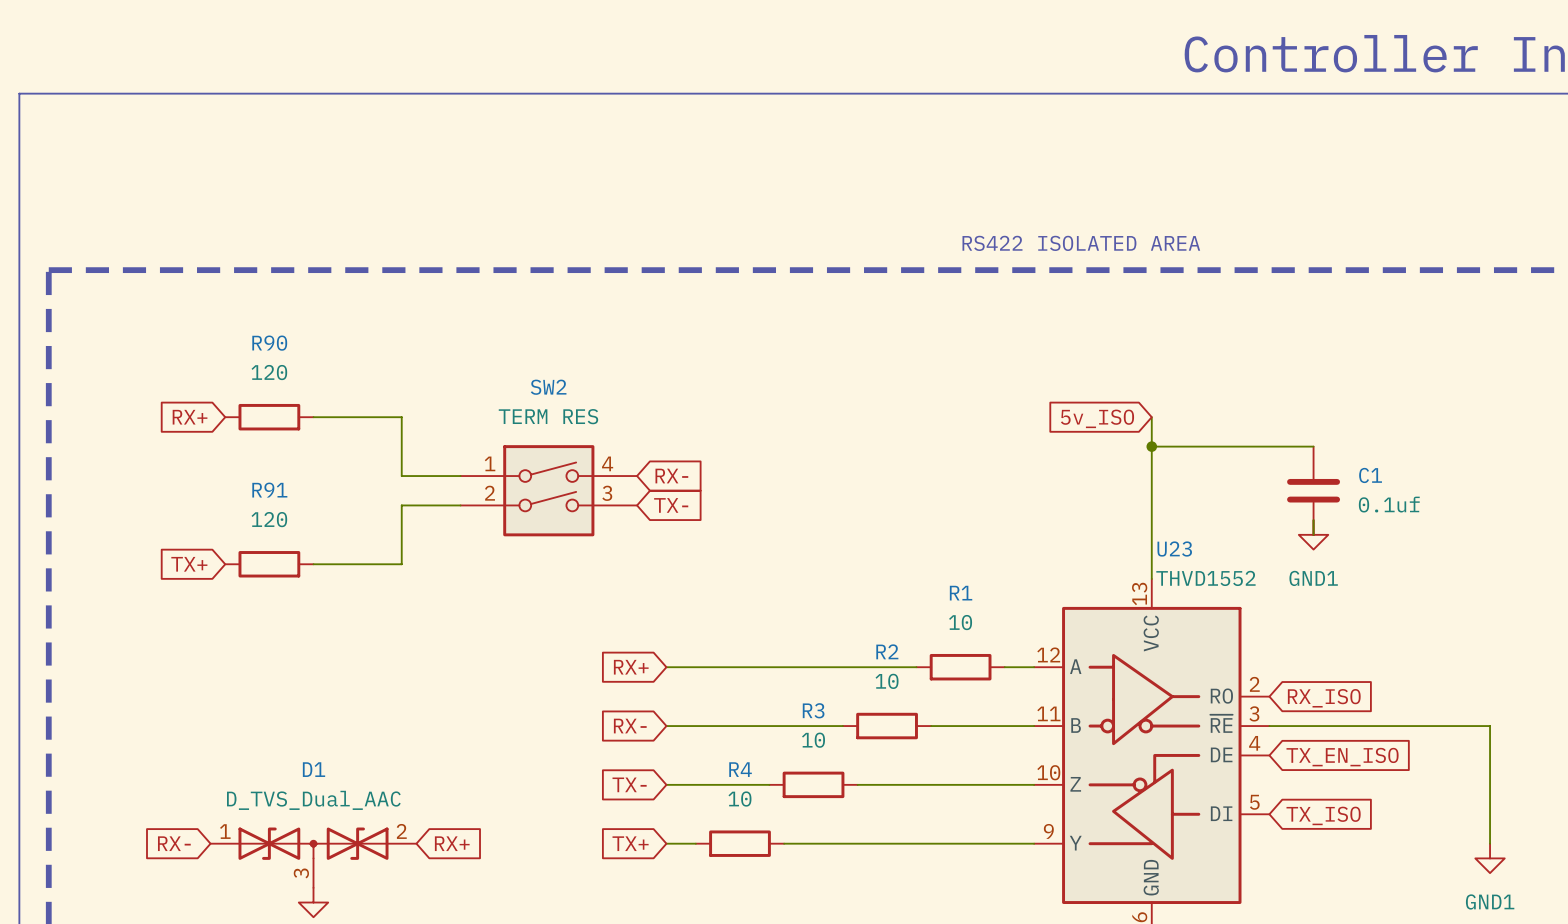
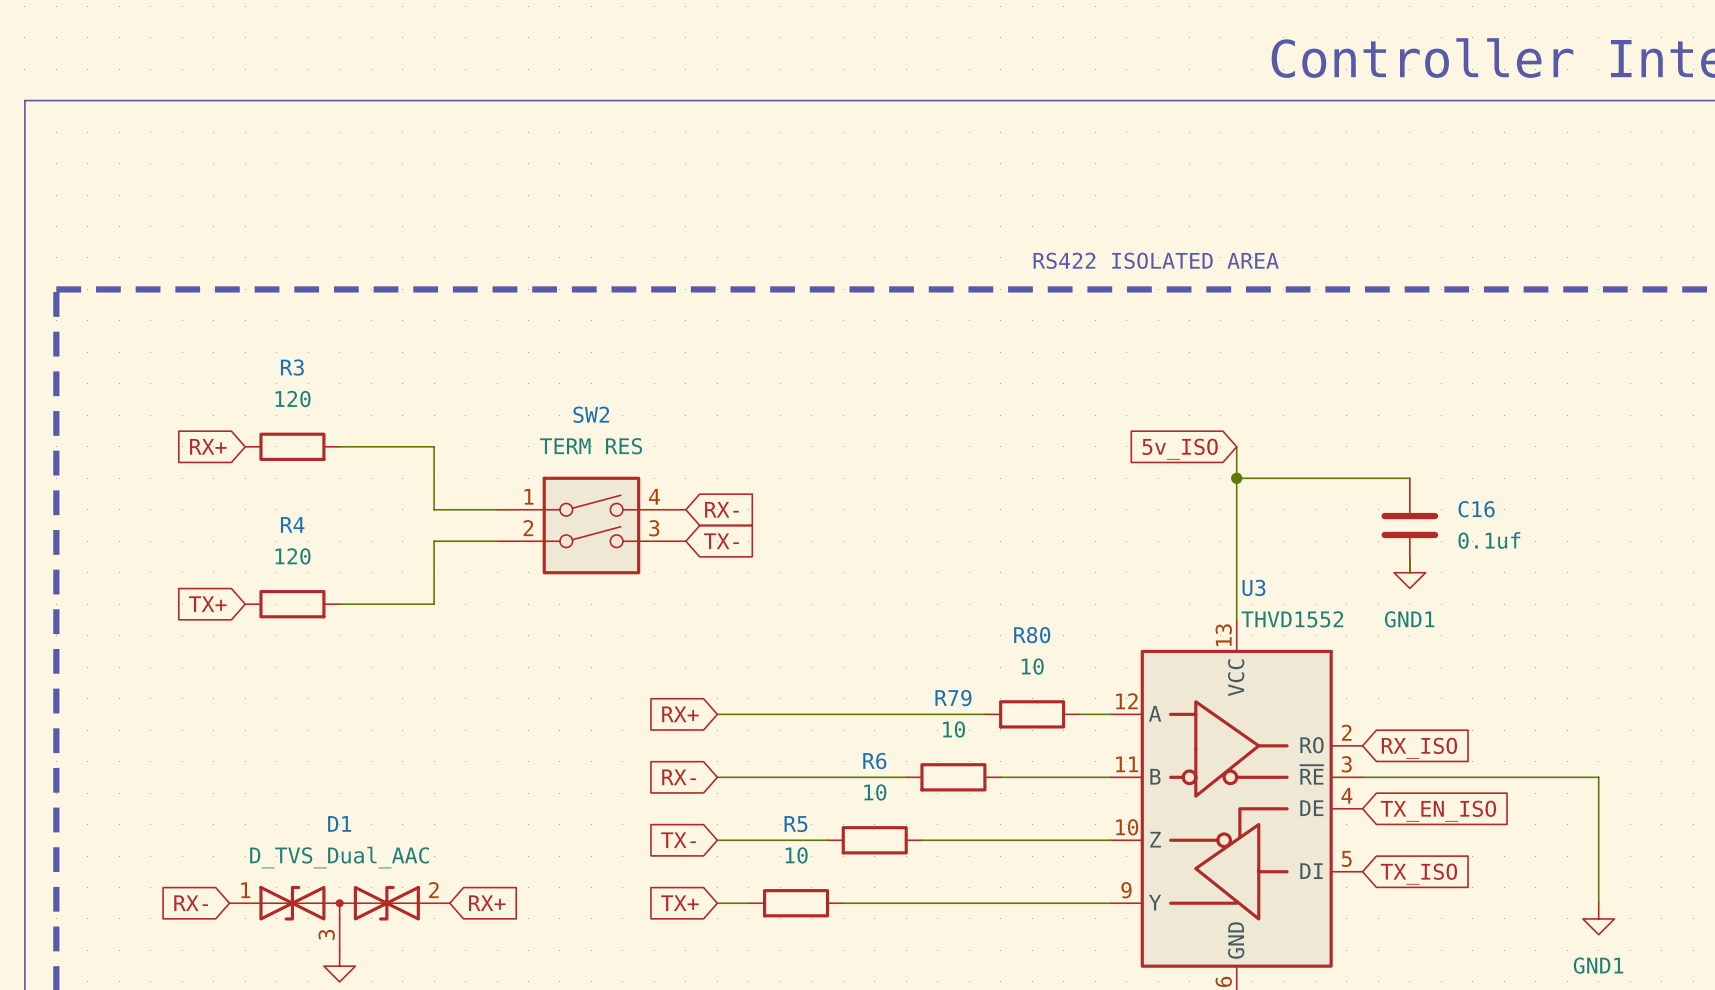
R90 name: R90 (269, 343) -> R3 (292, 367)
C1 name: C1 (1370, 475) -> C16 (1476, 509)
R91 name: R91 (269, 490) -> R4 (292, 524)
U23 name: U23 (1174, 549) -> U3 (1253, 587)
R1 name: R1 (961, 593) -> R80 (1032, 635)
R2 name: R2 (887, 651) -> R79 (953, 698)
R3 name: R3 (813, 710) -> R6 (874, 761)
R4 name: R4 (740, 769) -> R5 (795, 824)

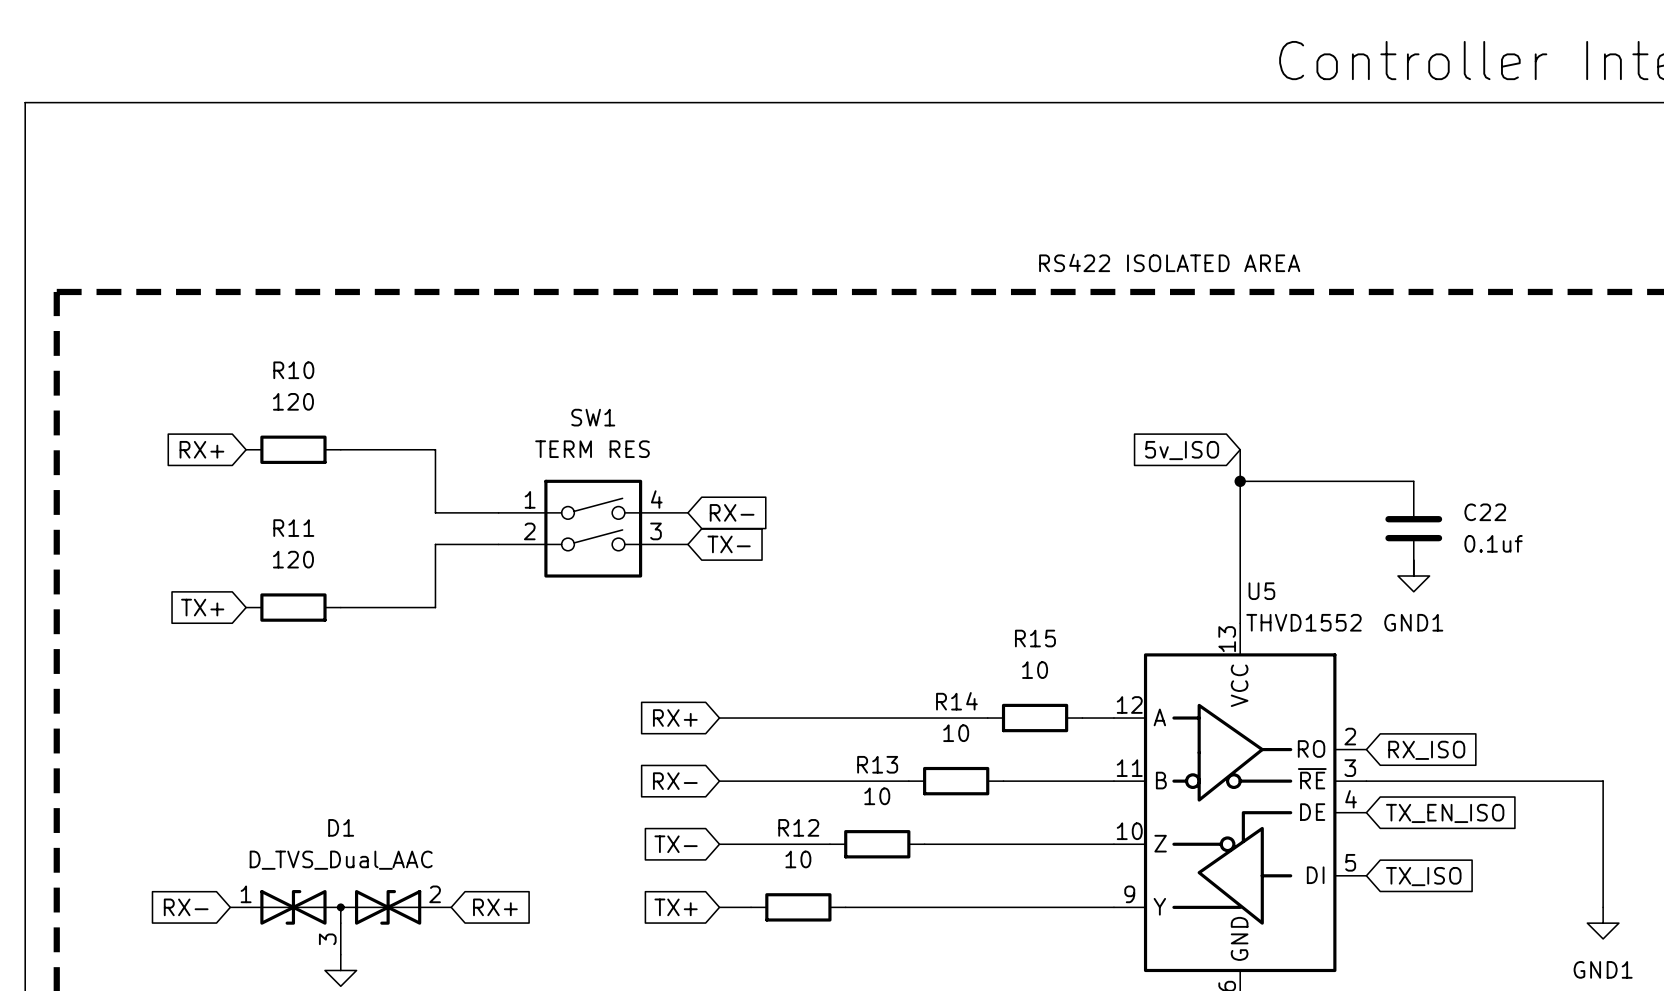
R3 name: R3 (292, 367) -> R10 (293, 370)
SW2 name: SW2 (591, 414) -> SW1 (593, 417)
C16 name: C16 (1476, 509) -> C22 (1485, 512)
R4 name: R4 (292, 524) -> R11 (293, 528)
U3 name: U3 (1253, 587) -> U5 (1261, 591)
R80 name: R80 (1032, 635) -> R15 (1035, 638)
R79 name: R79 (953, 698) -> R14 (956, 701)
R6 name: R6 (874, 761) -> R13 (877, 764)
R5 name: R5 (795, 824) -> R12 (798, 827)

